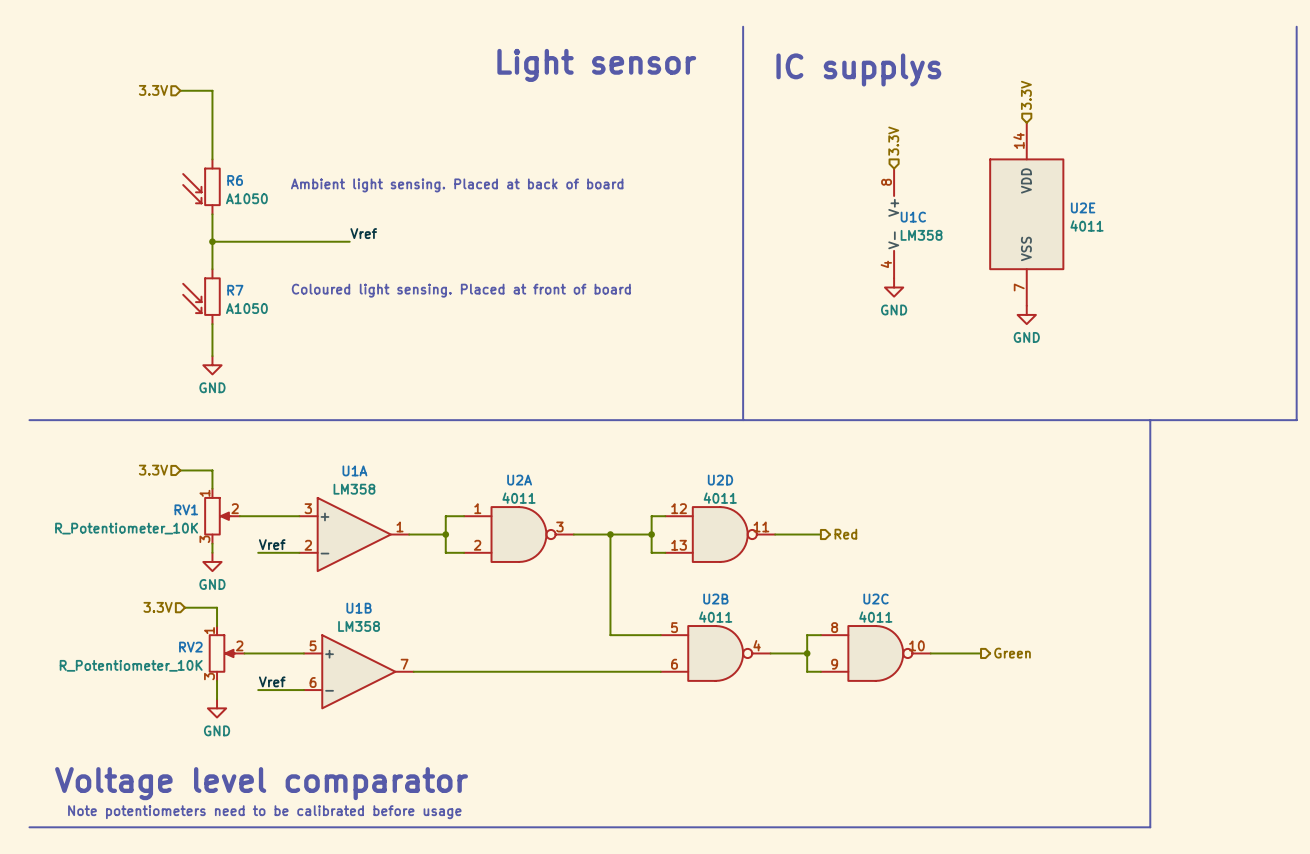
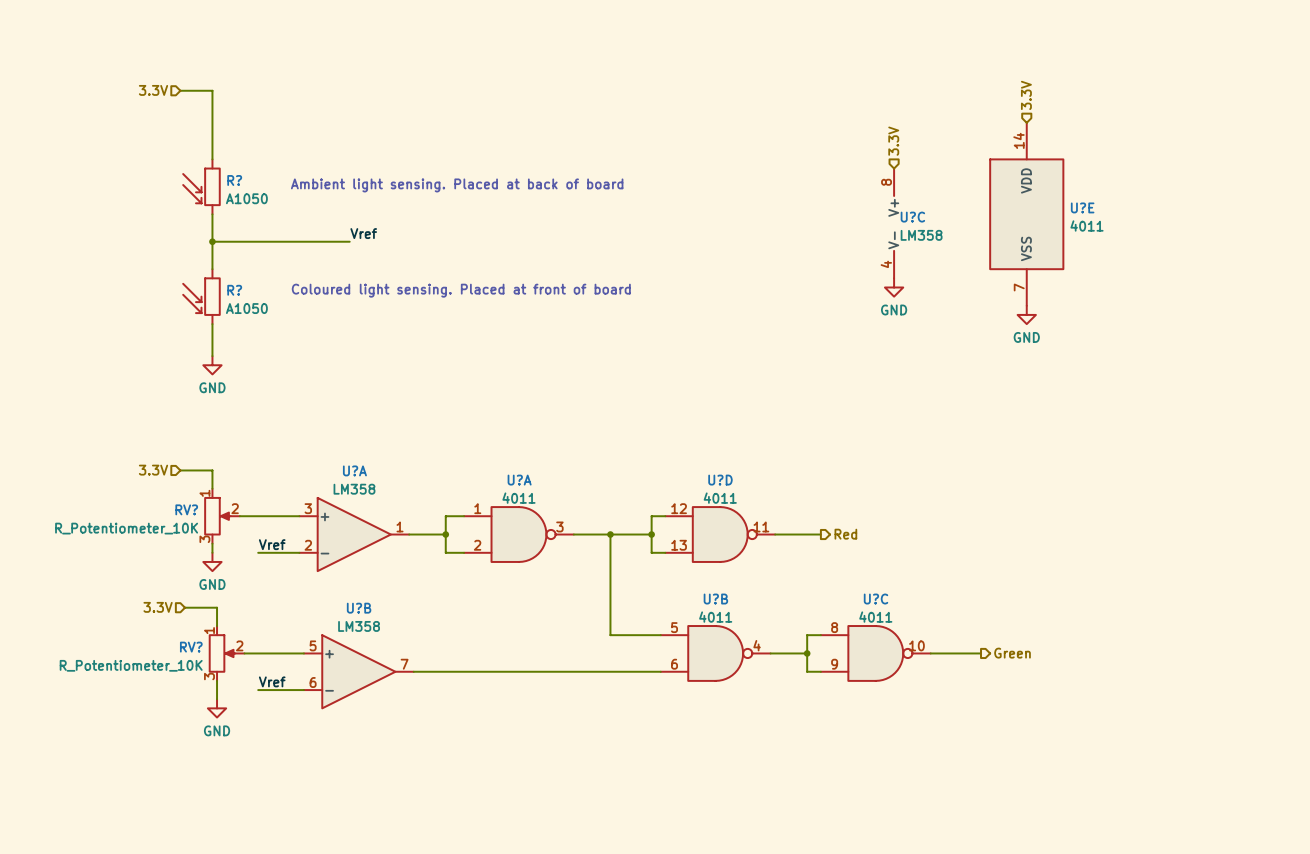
line: (743, 26) (743, 420) -> none
line: (1296, 26) (1296, 420) (29, 420) -> none
text: Light sensor (596, 65) -> none
text: IC supplys (858, 69) -> none
R6 name: R6 (235, 180) -> R? (234, 180)
U2E name: U2E (1083, 207) -> U?E (1082, 207)
U1C name: U1C (913, 217) -> U?C (912, 217)
R7 name: R7 (235, 290) -> R? (234, 290)
line: (1150, 420) (1150, 827) (29, 827) -> none
U1A name: U1A (354, 470) -> U?A (354, 470)
U2A name: U2A (519, 480) -> U?A (519, 480)
U2D name: U2D (720, 480) -> U?D (720, 480)
RV1 name: RV1 (186, 509) -> RV? (186, 509)
U2B name: U2B (715, 599) -> U?B (715, 599)
U2C name: U2C (876, 599) -> U?C (876, 599)
U1B name: U1B (359, 608) -> U?B (359, 608)
RV2 name: RV2 (190, 647) -> RV? (191, 647)
text: Voltage level comparator (261, 783) -> none
text: Note potentiometers need to be calibrated before usage (264, 812) -> none

